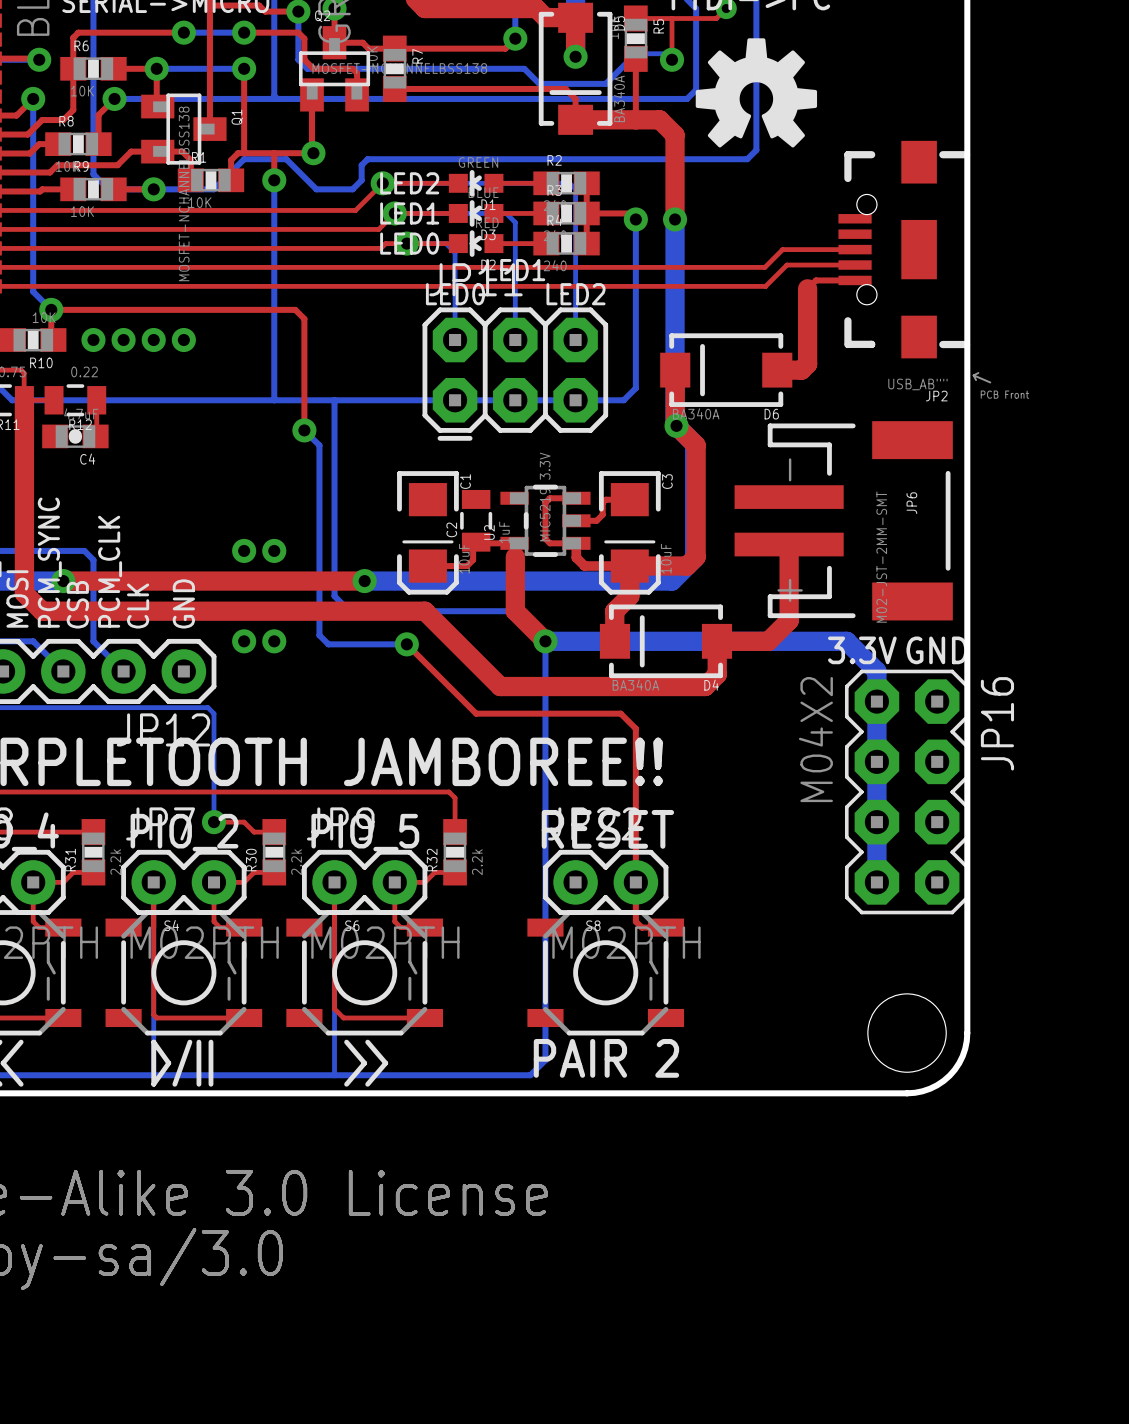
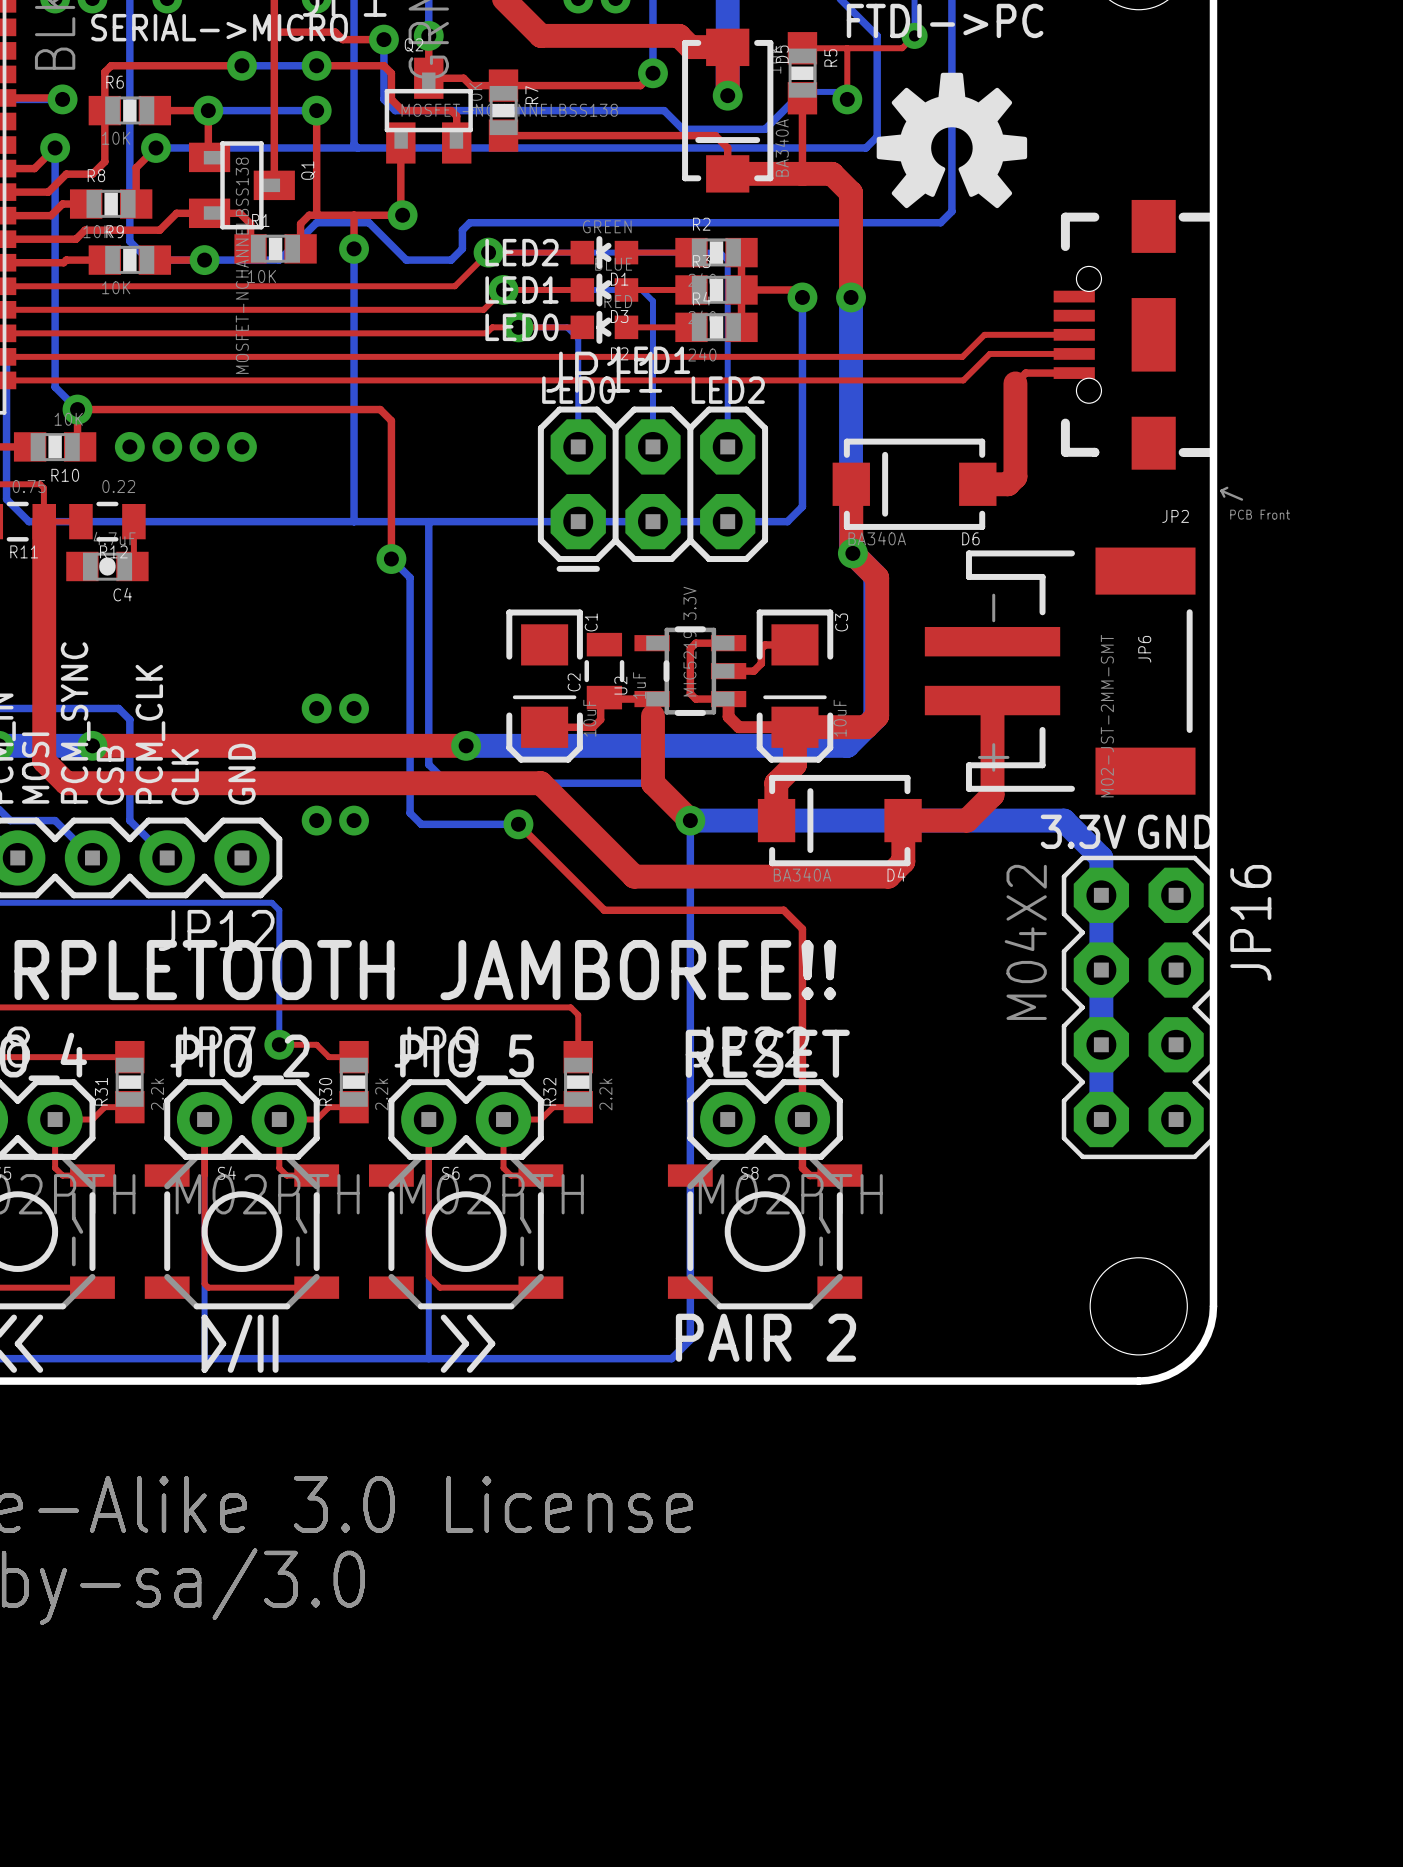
JP2 value: USB_AB"" (917, 384) -> none

